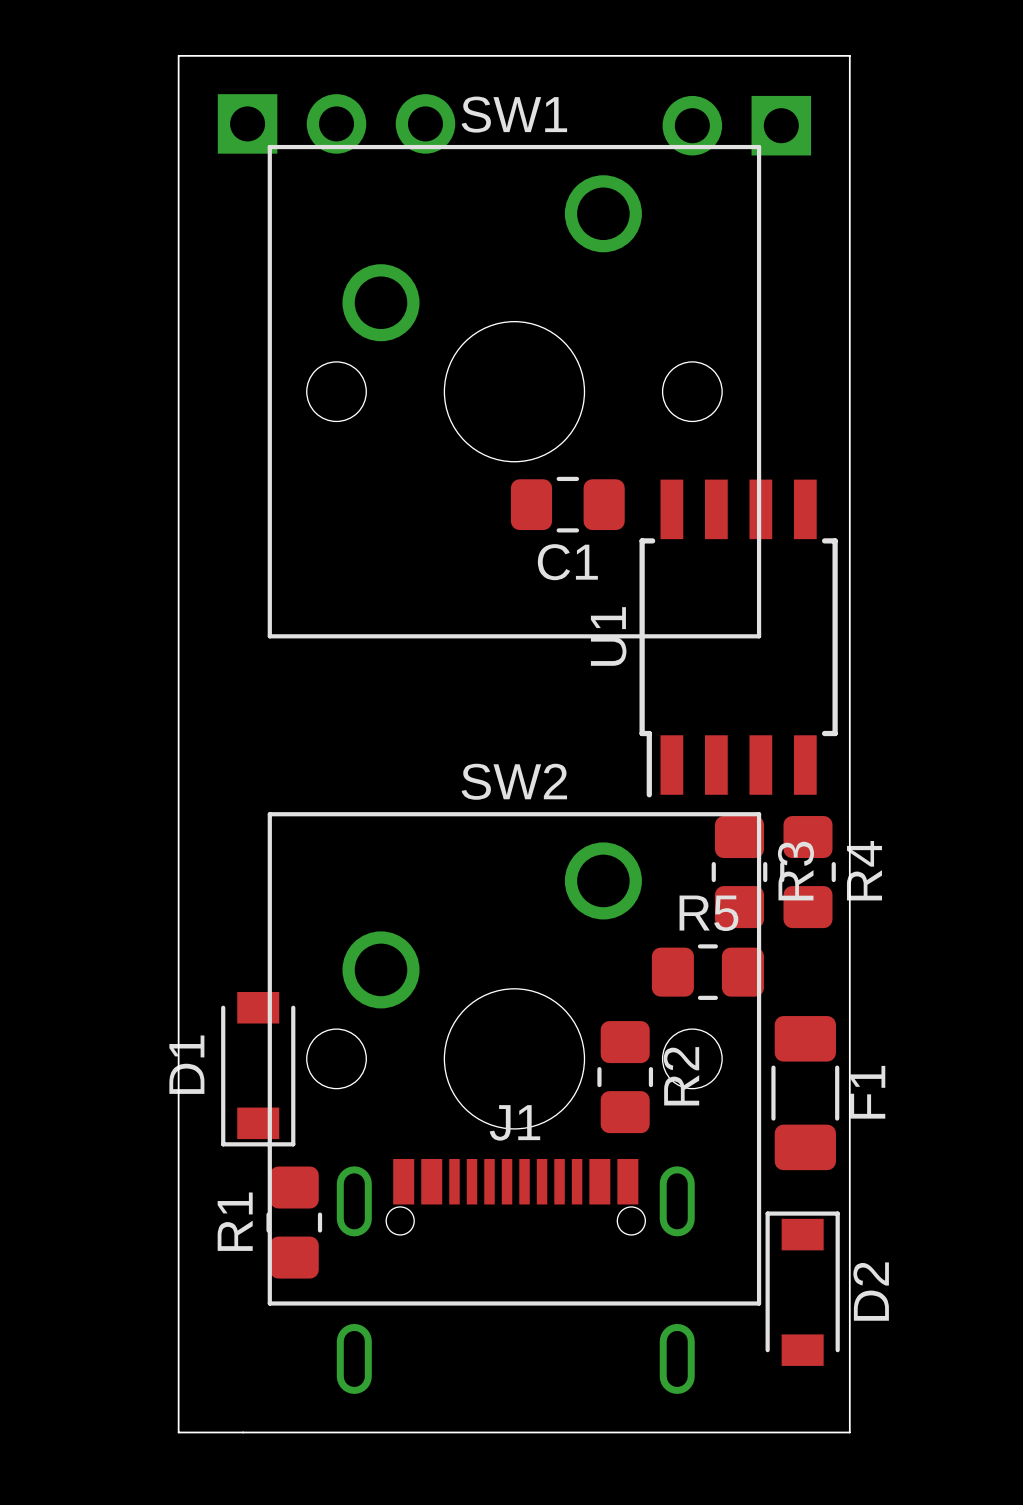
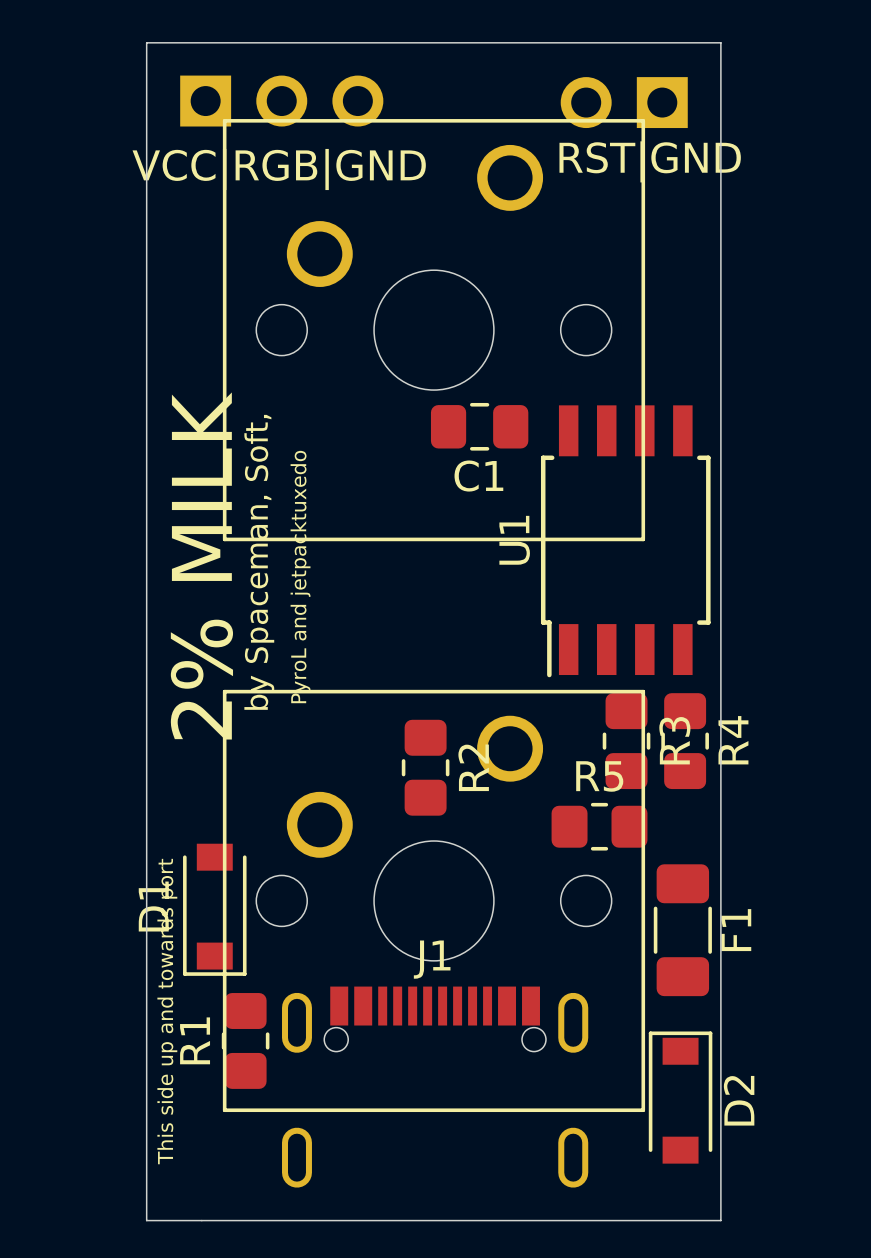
SW1 name: SW1 (514, 114) -> none
text: none -> RST|GND (650, 161)
text: none -> VCC|RGB|GND (279, 169)
text: none -> by Spaceman, Soft, (259, 562)
text: none -> 2% MILK (201, 565)
text: none -> PyroL and jetpacktuxedo (300, 577)
SW2 name: SW2 (514, 781) -> none
R2 position: (625, 1077) -> (425, 767)
text: none -> This side up and towards port (167, 1011)

